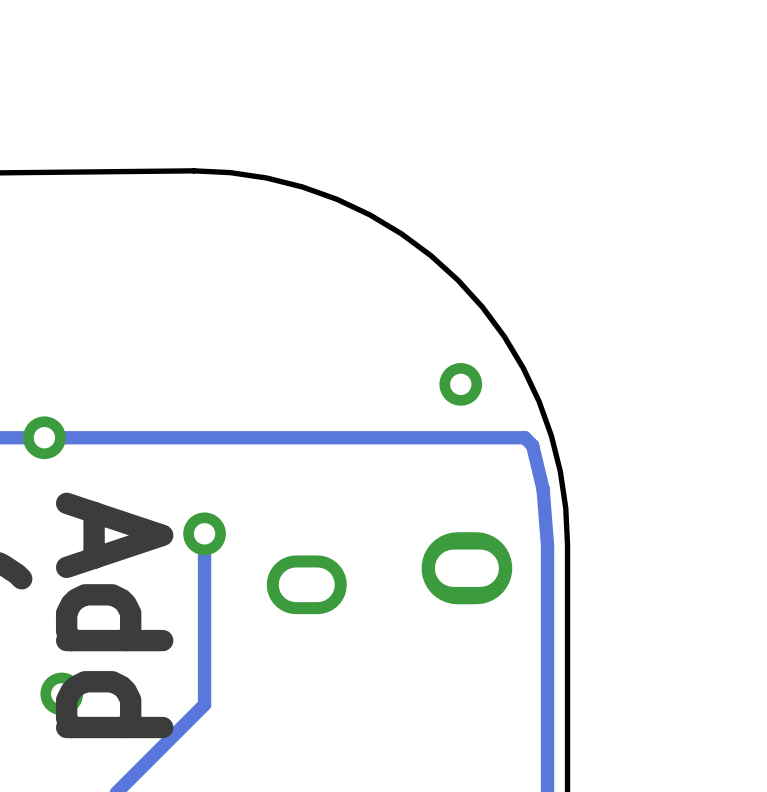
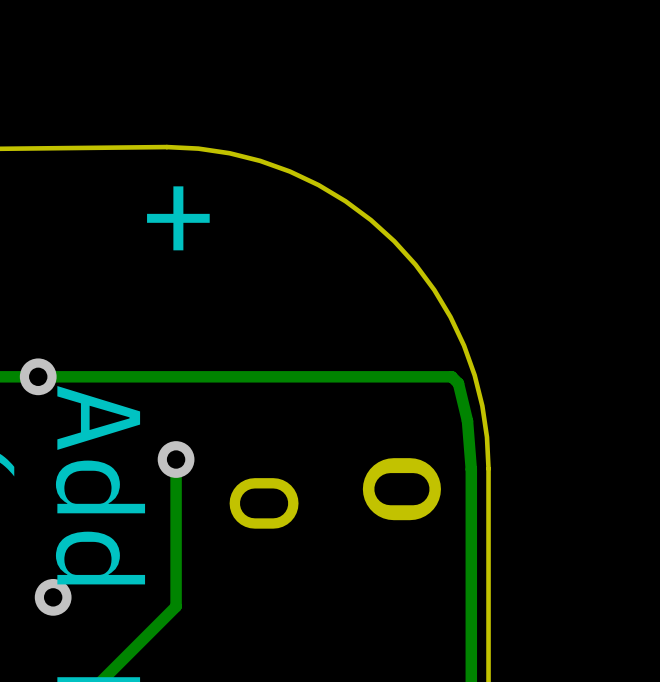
text: none -> + (178, 218)
via: (460, 384) -> none

